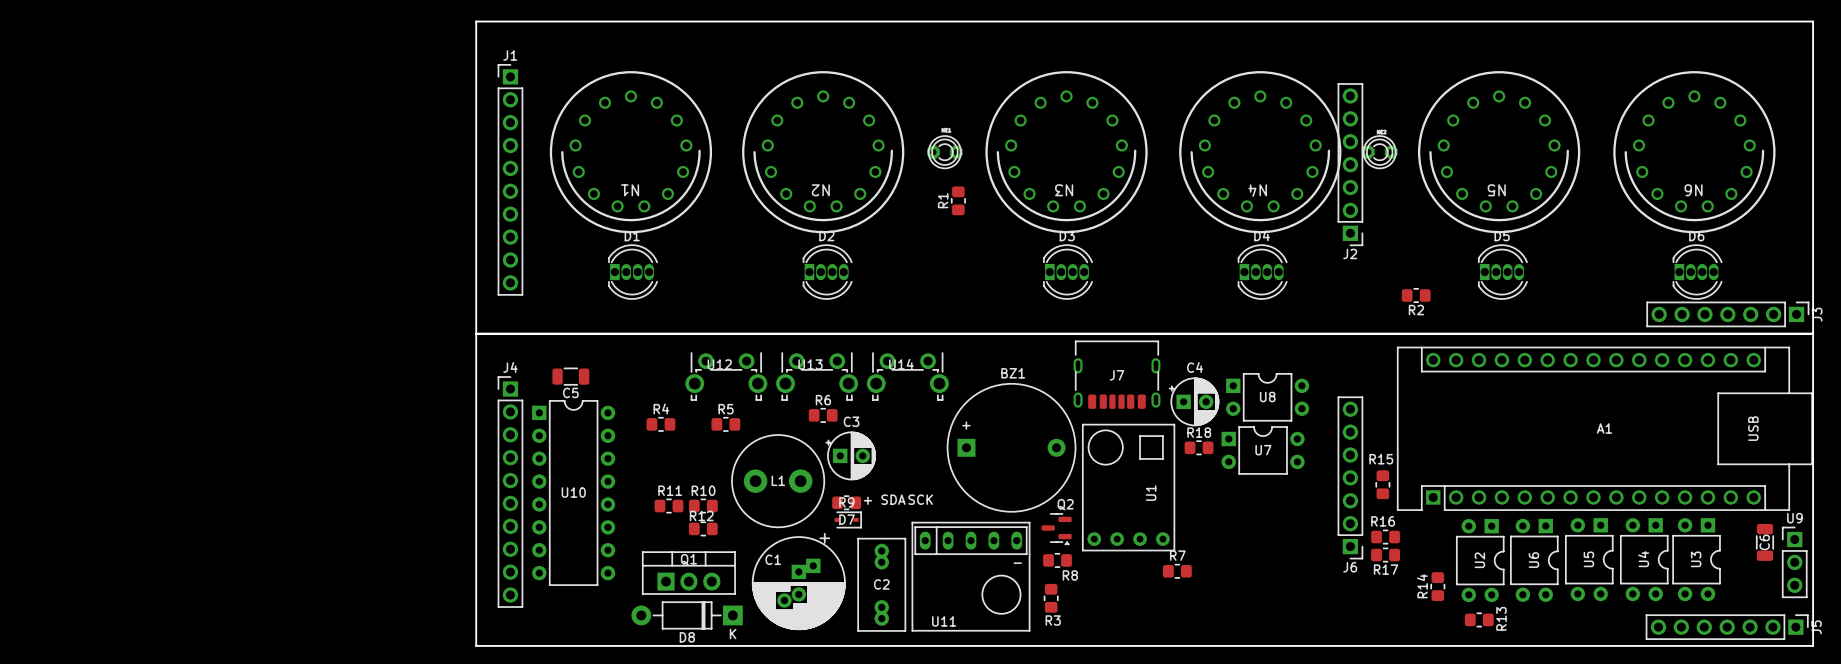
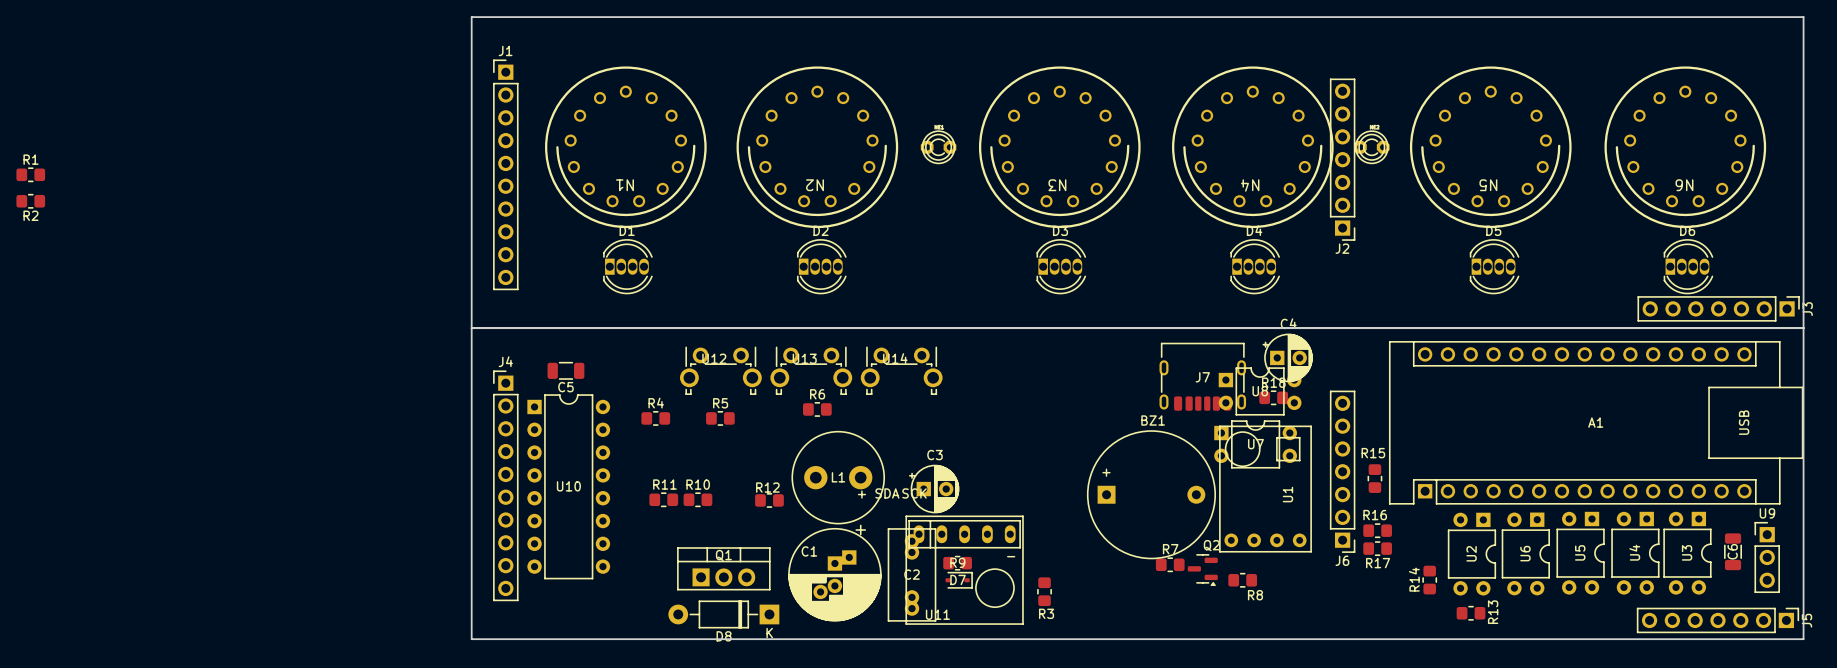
part rotation: 0° (944, 152) -> 180° (938, 147)
part rotation: 0° (1379, 152) -> 180° (1371, 147)
R1 rotation: 0° (958, 200) -> 90° clockwise (30, 174)
R1 position: (958, 200) -> (30, 174)
R2 position: (1416, 295) -> (30, 201)
J7 position: (1116, 374) -> (1202, 376)
C4 position: (1194, 401) -> (1287, 357)
BZ1 position: (1011, 447) -> (1151, 494)
R18 position: (1199, 447) -> (1273, 397)
C3 position: (850, 455) -> (934, 489)
L1 position: (778, 481) -> (838, 477)
U1 position: (1128, 487) -> (1265, 489)
R9 position: (846, 502) -> (957, 563)
D7 position: (848, 519) -> (959, 580)
R12 position: (703, 528) -> (769, 500)
Q2 position: (1056, 529) -> (1202, 570)
C6 position: (1764, 542) -> (1733, 551)
R8 position: (1057, 560) -> (1242, 580)
U9 position: (1794, 562) -> (1767, 557)
Q1 position: (688, 573) -> (723, 568)
C1 position: (798, 581) -> (834, 573)
C2 position: (881, 584) -> (912, 574)
D8 position: (687, 615) -> (723, 614)

